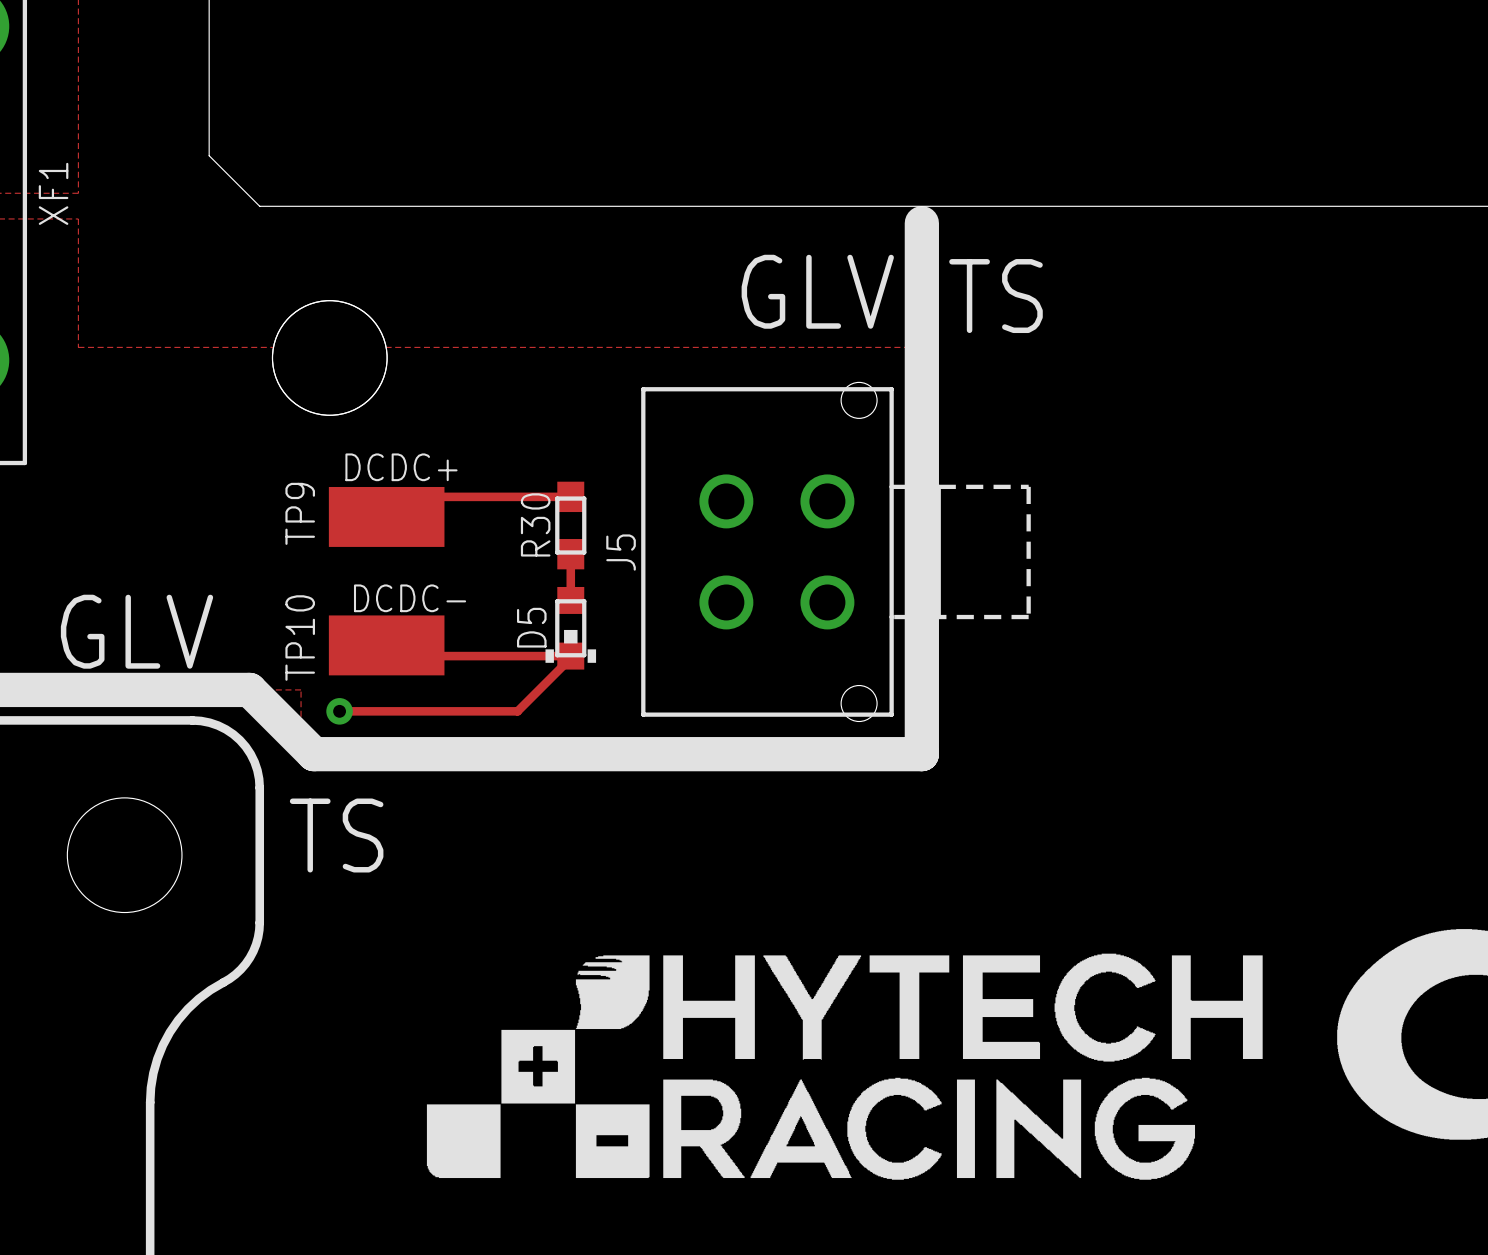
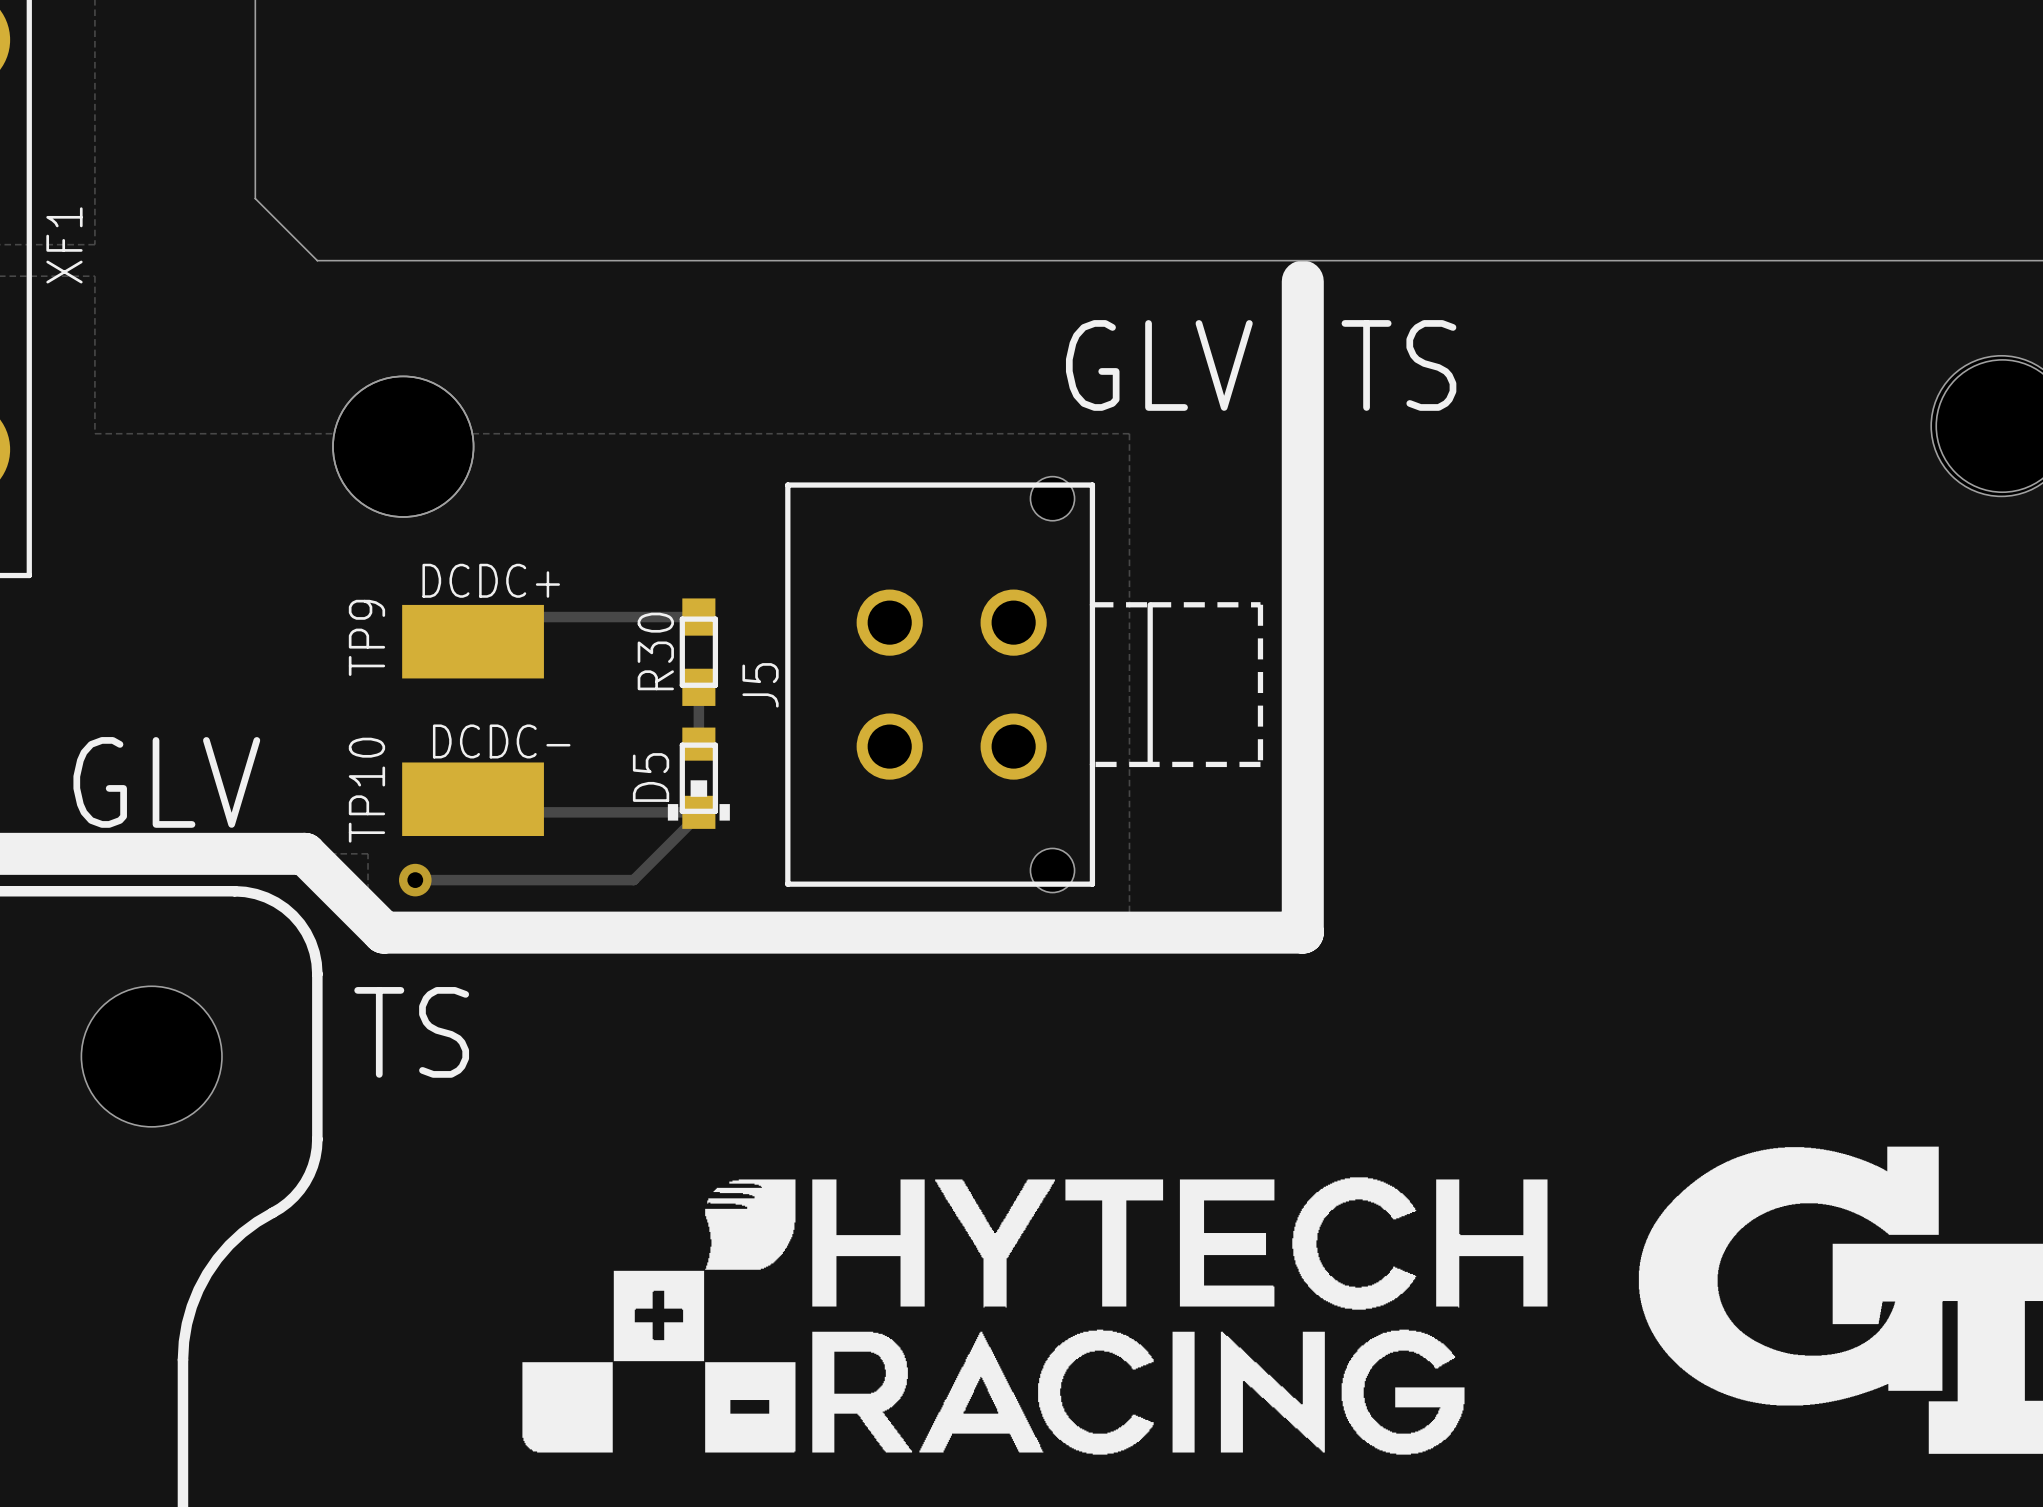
line: (921, 223) (921, 754) -> (1302, 281) (1302, 932) (1129, 932)
drawing position: (817, 291) -> (1159, 365)
drawing position: (995, 296) -> (1398, 365)

